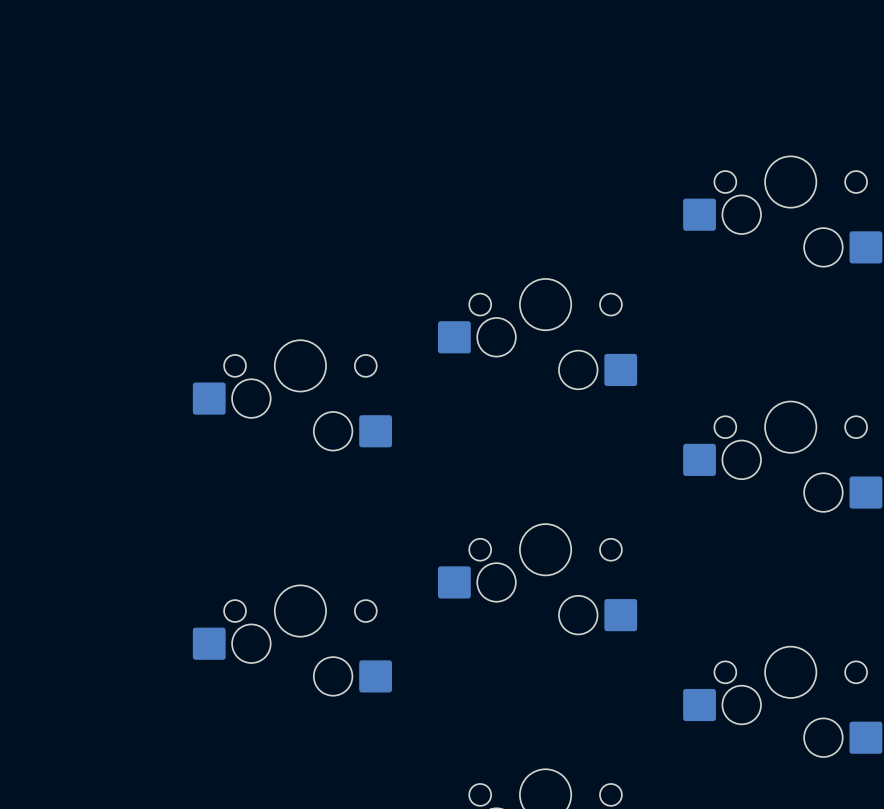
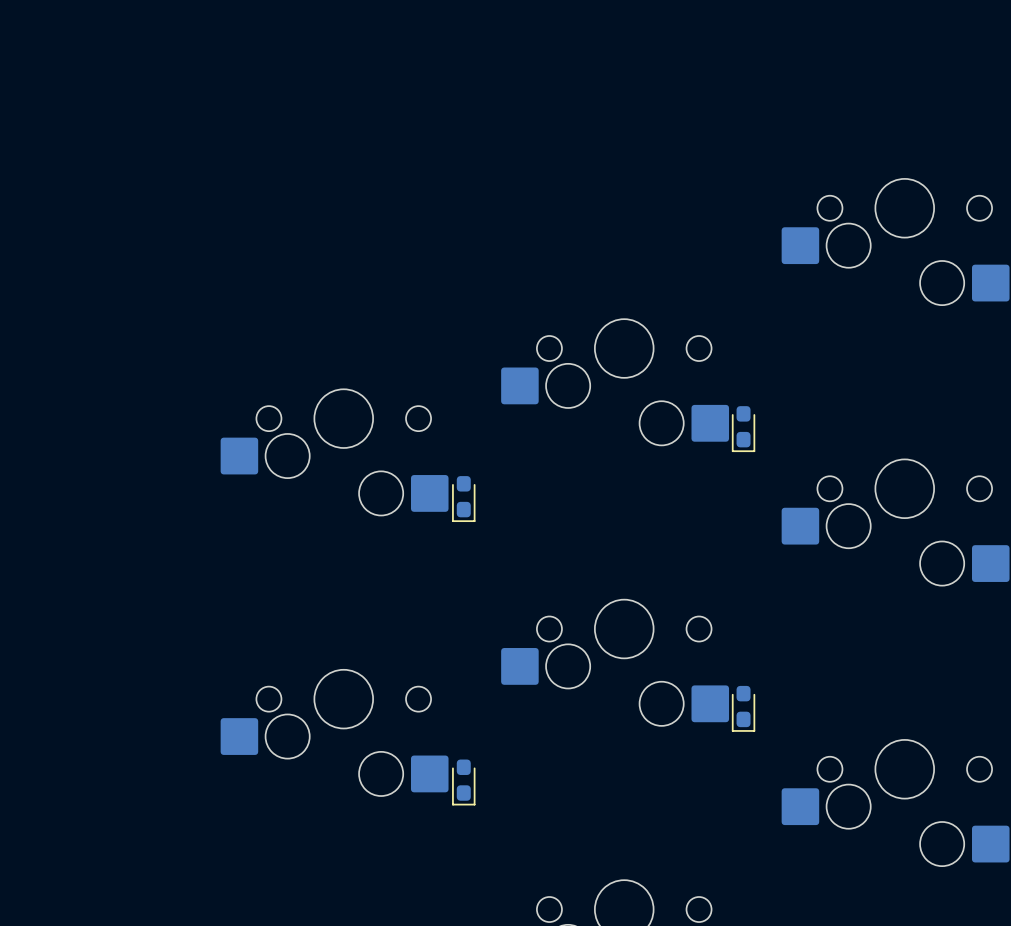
part: none -> (743, 429)
part: none -> (463, 499)
part: none -> (743, 708)
part: none -> (463, 782)

